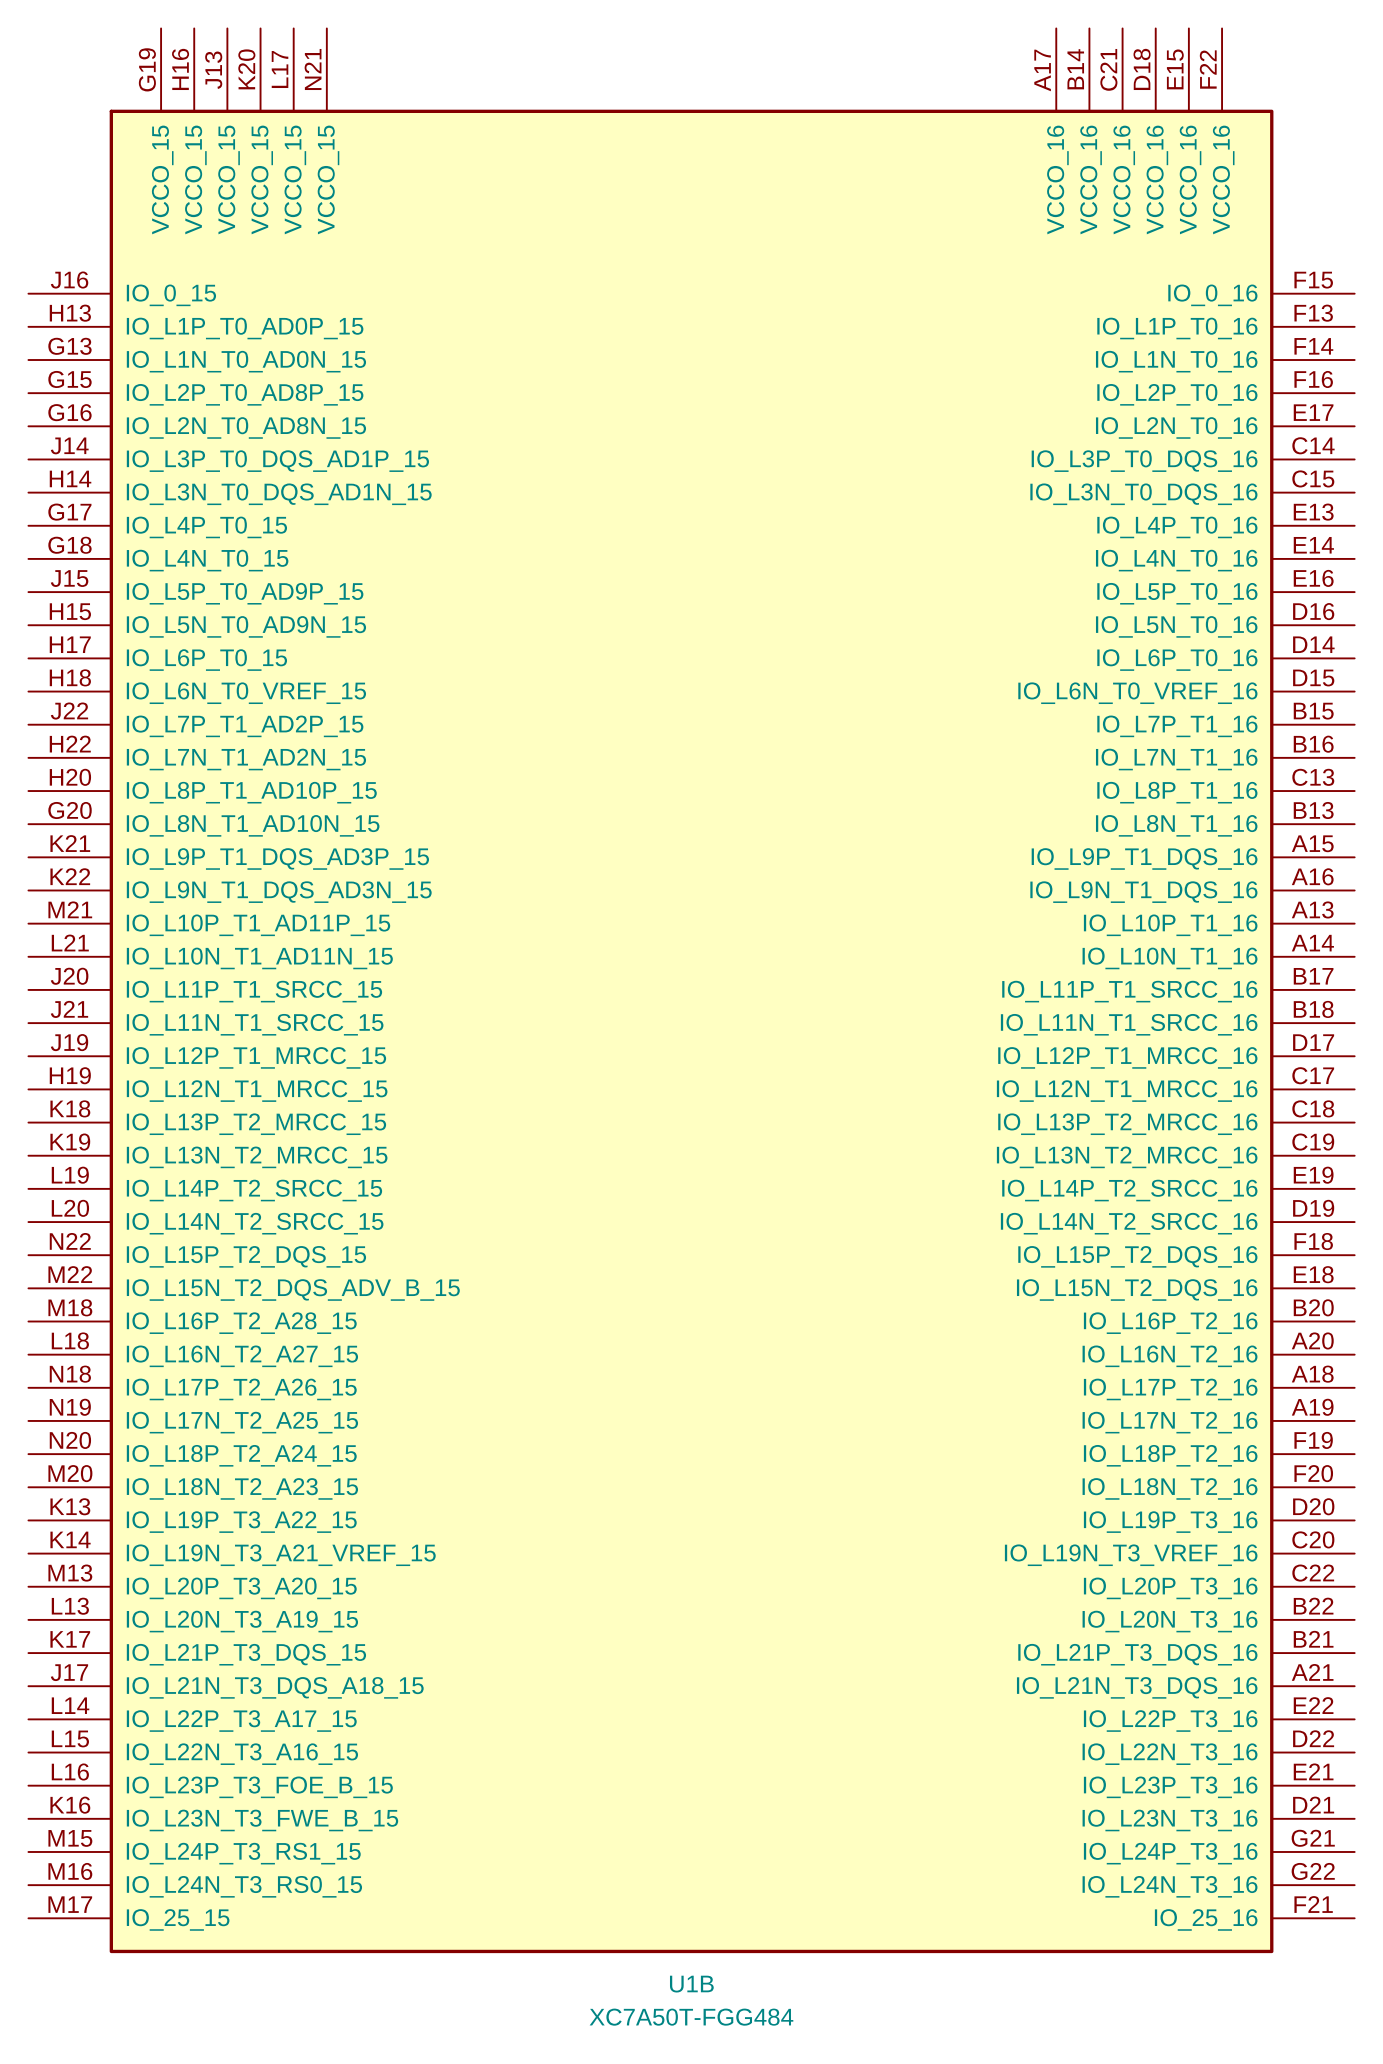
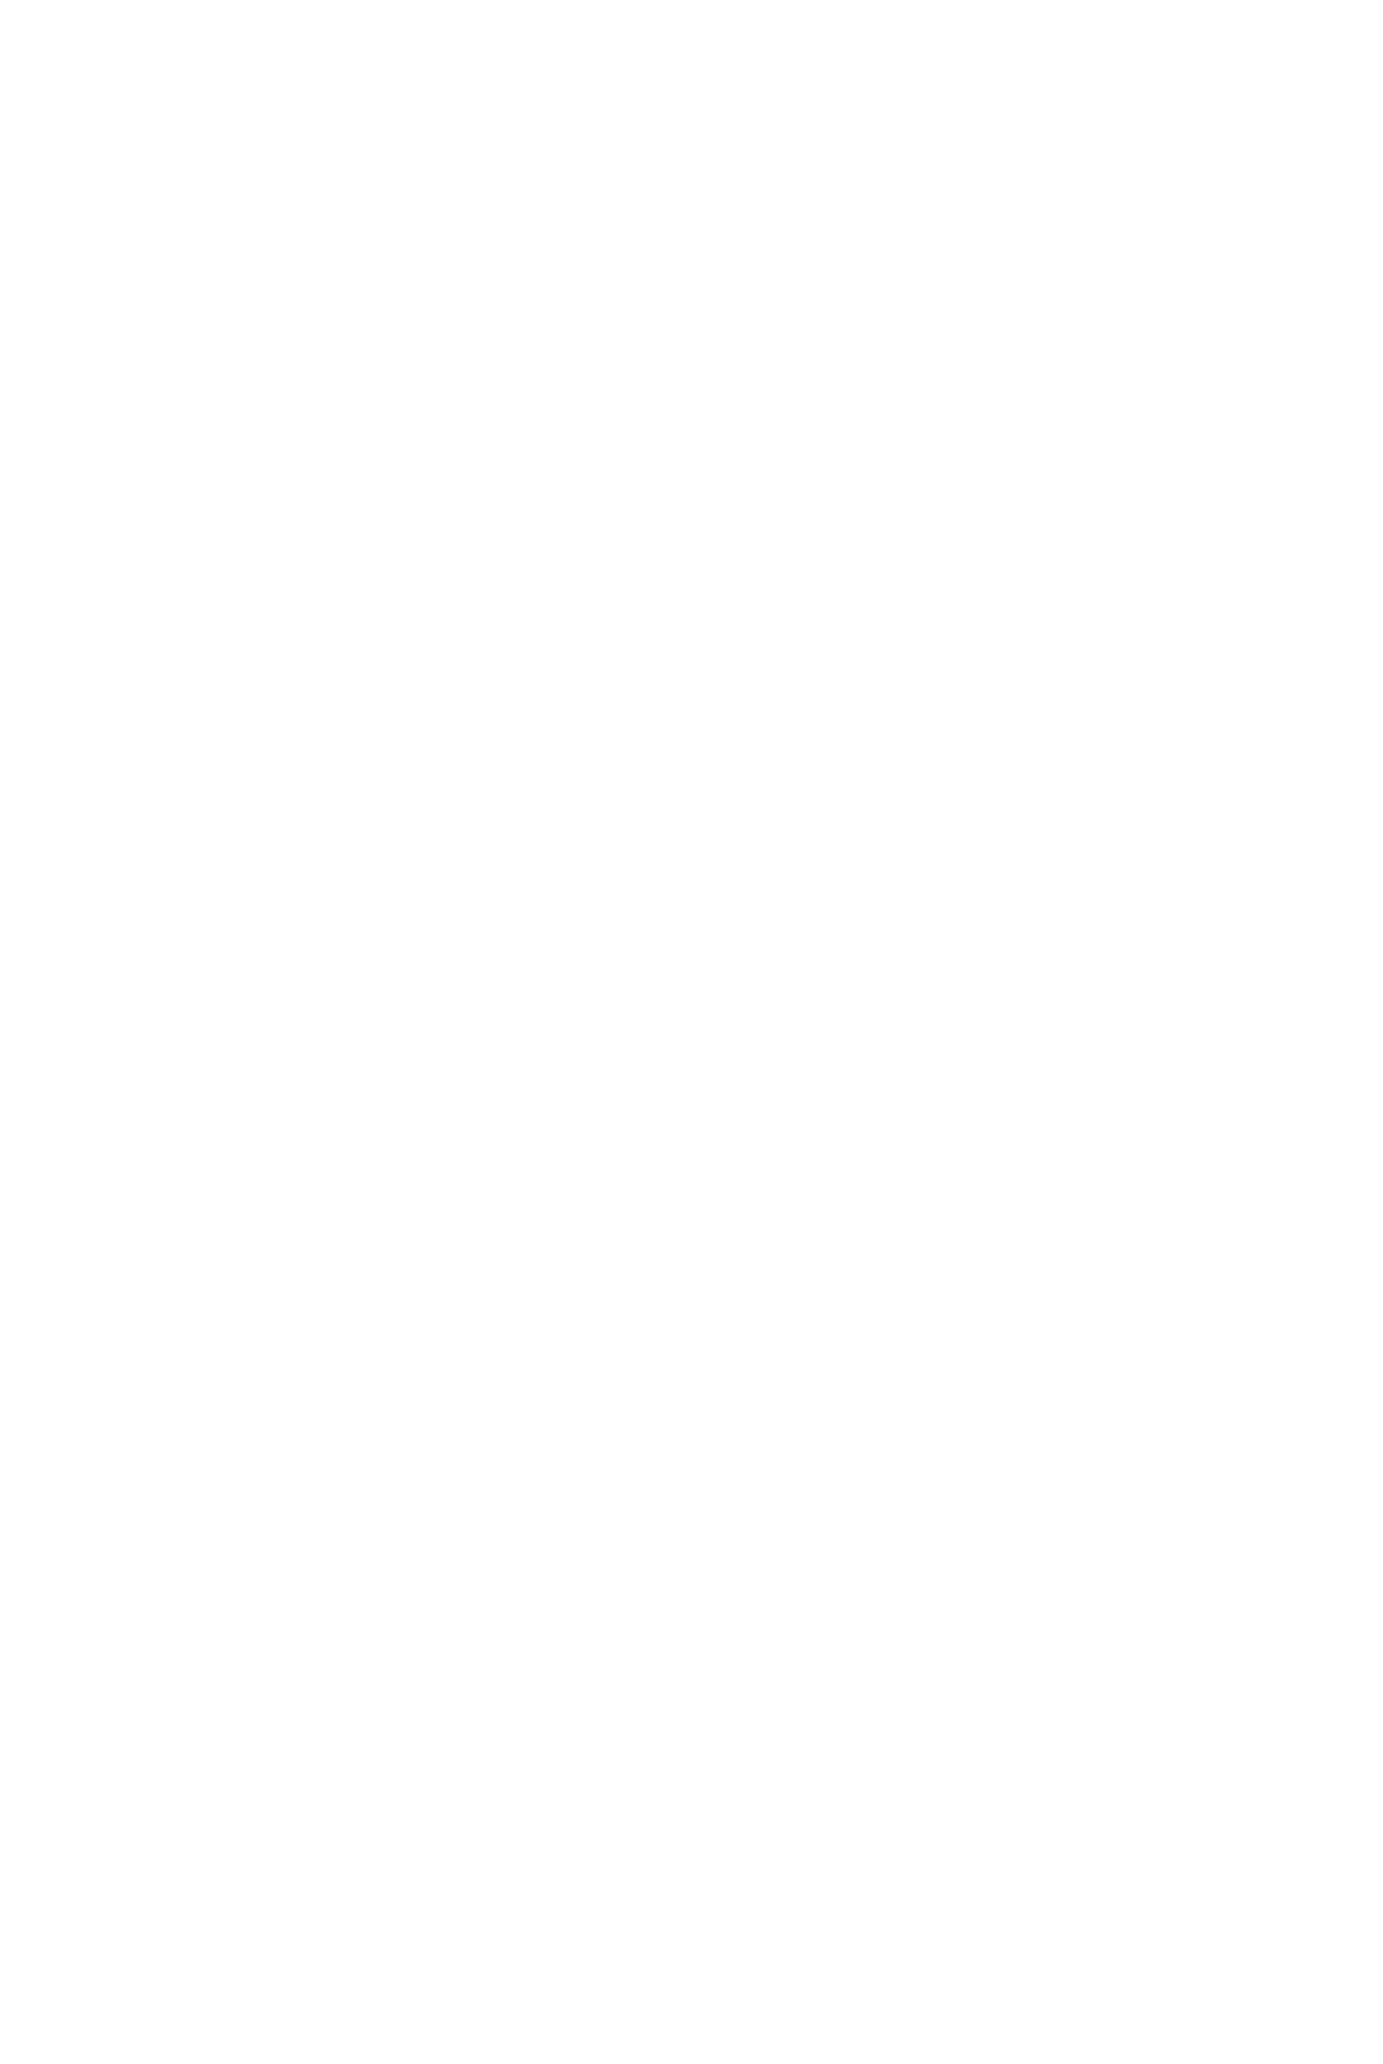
U1B: XC7A50T-FGG484 (691, 990) -> none

